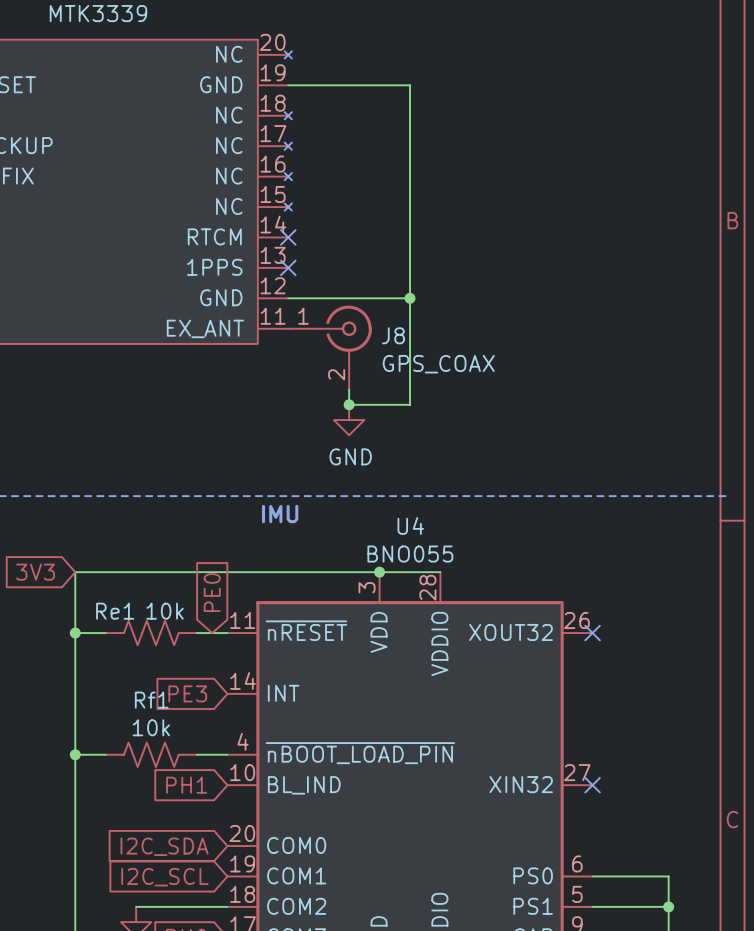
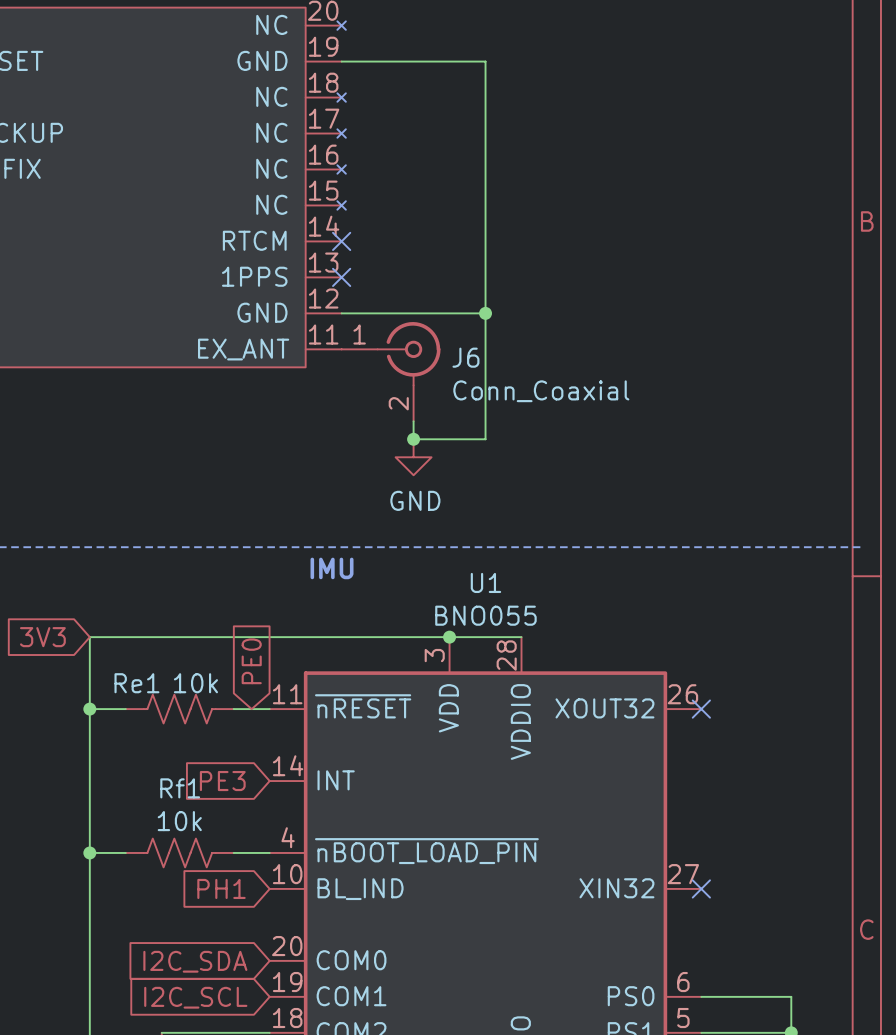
J8 name: J8 (393, 335) -> J6 (465, 357)
J8 value: GPS_COAX (438, 364) -> Conn_Coaxial (541, 391)
U4 name: U4 (410, 525) -> U1 (485, 582)

